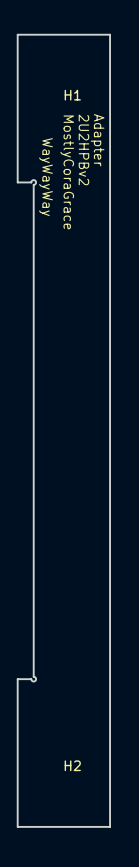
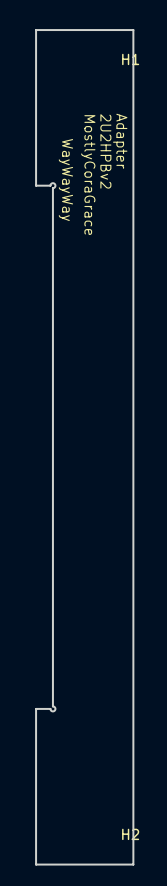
H1 name position: H1 (72, 95) -> H1 (130, 59)
H2 name position: H2 (72, 765) -> H2 (130, 834)

